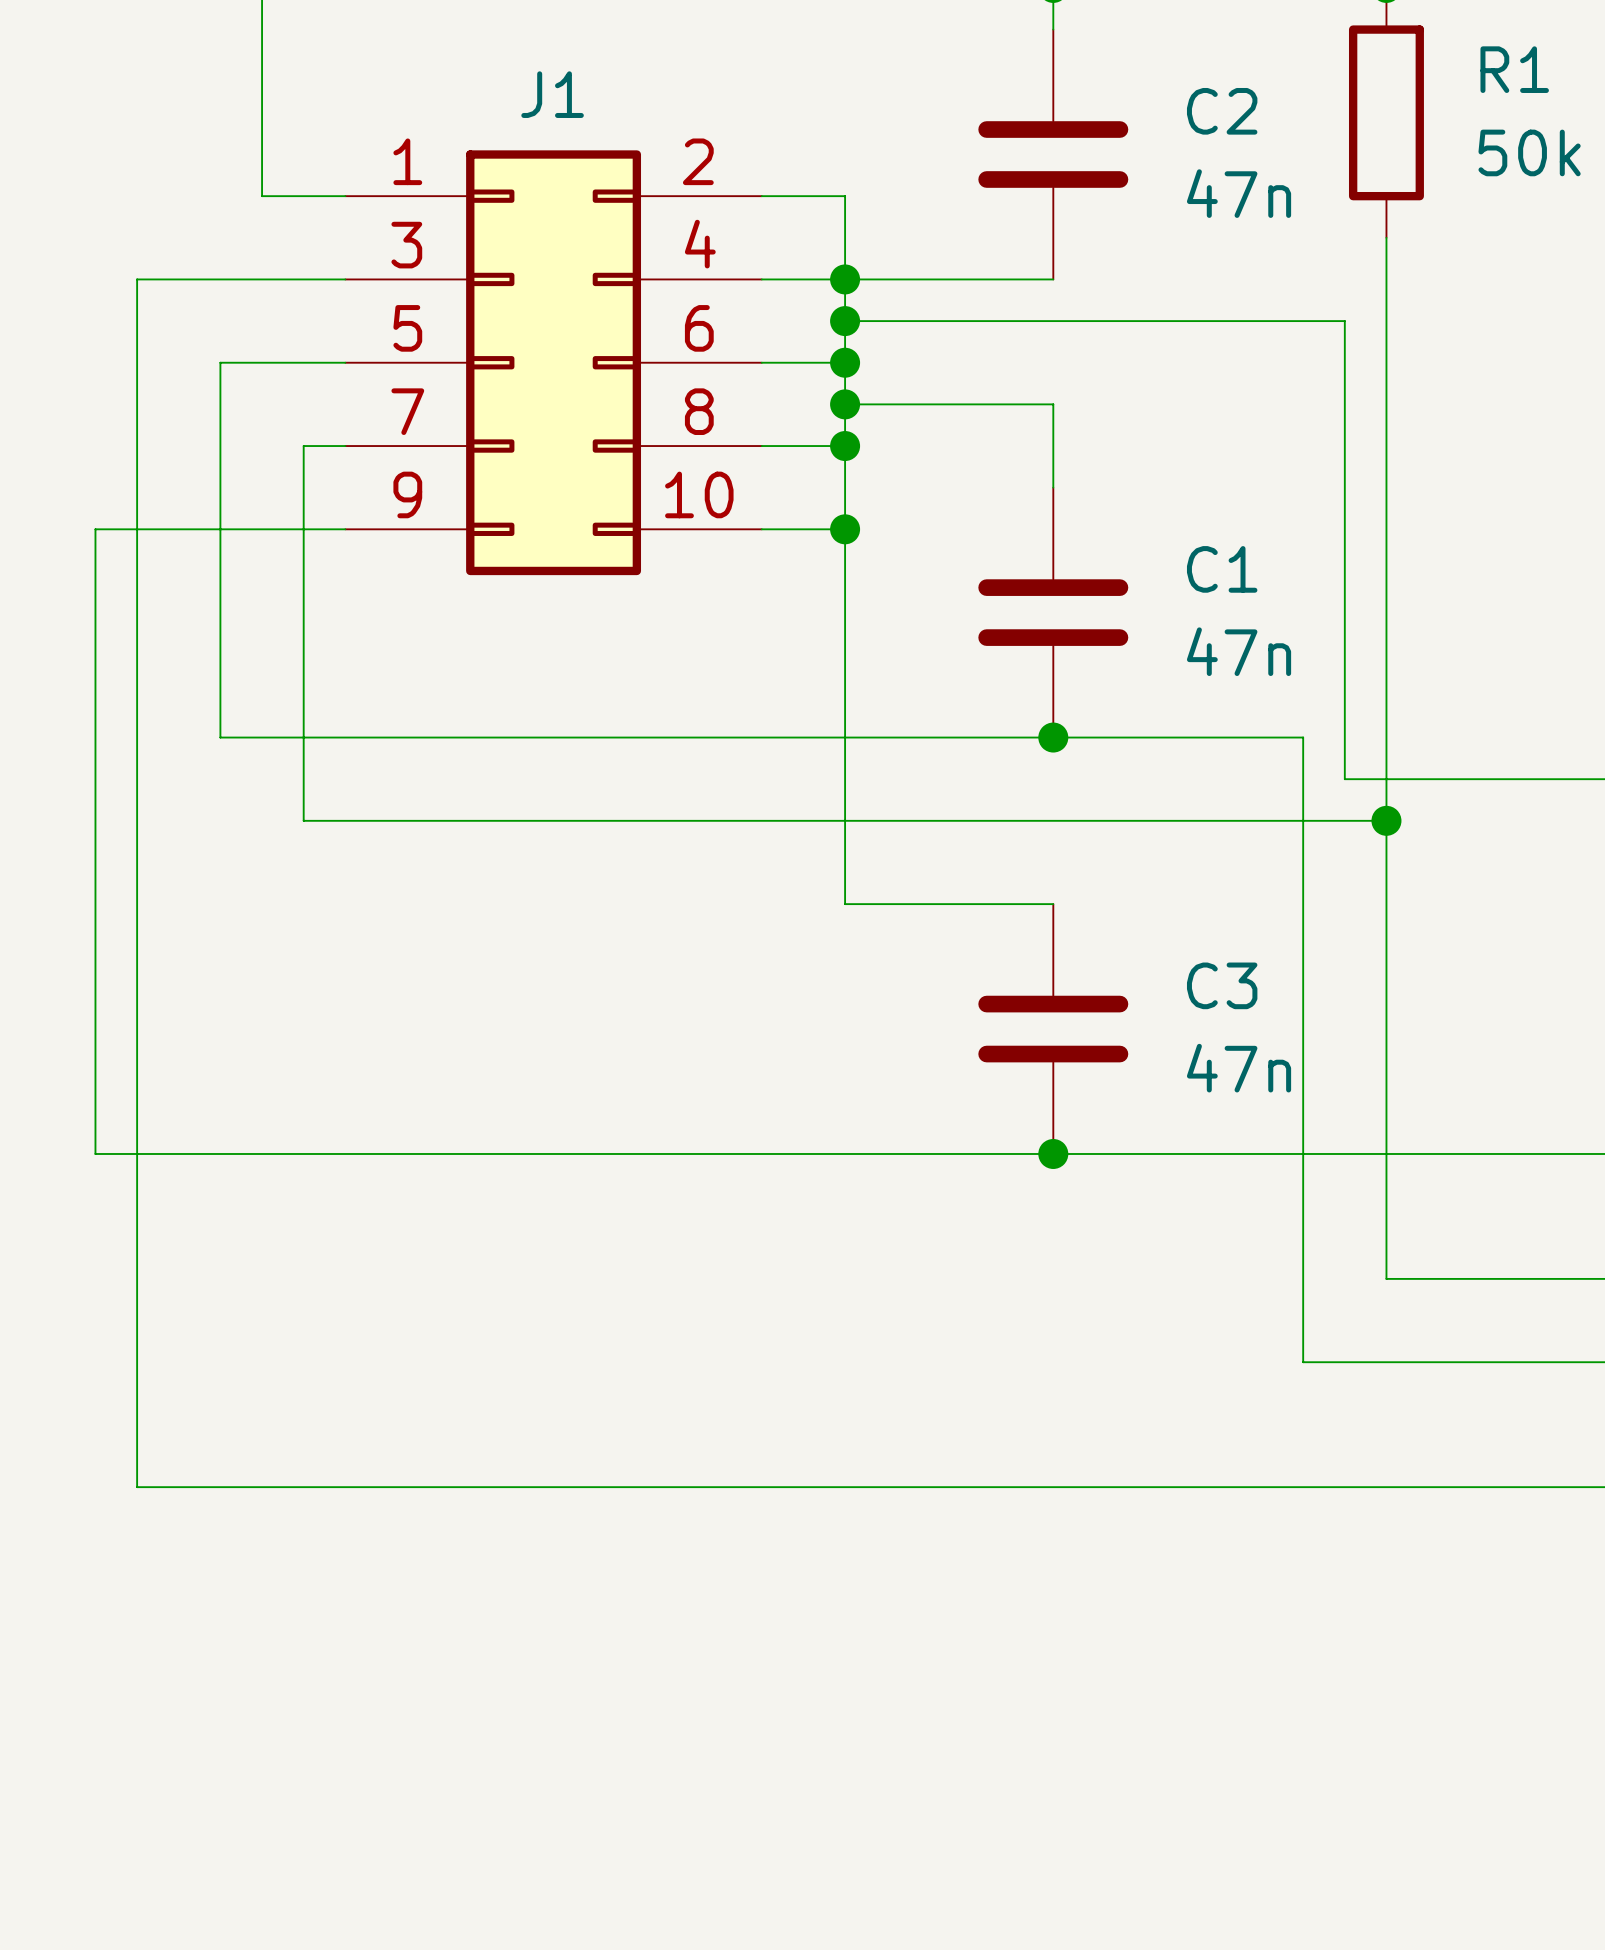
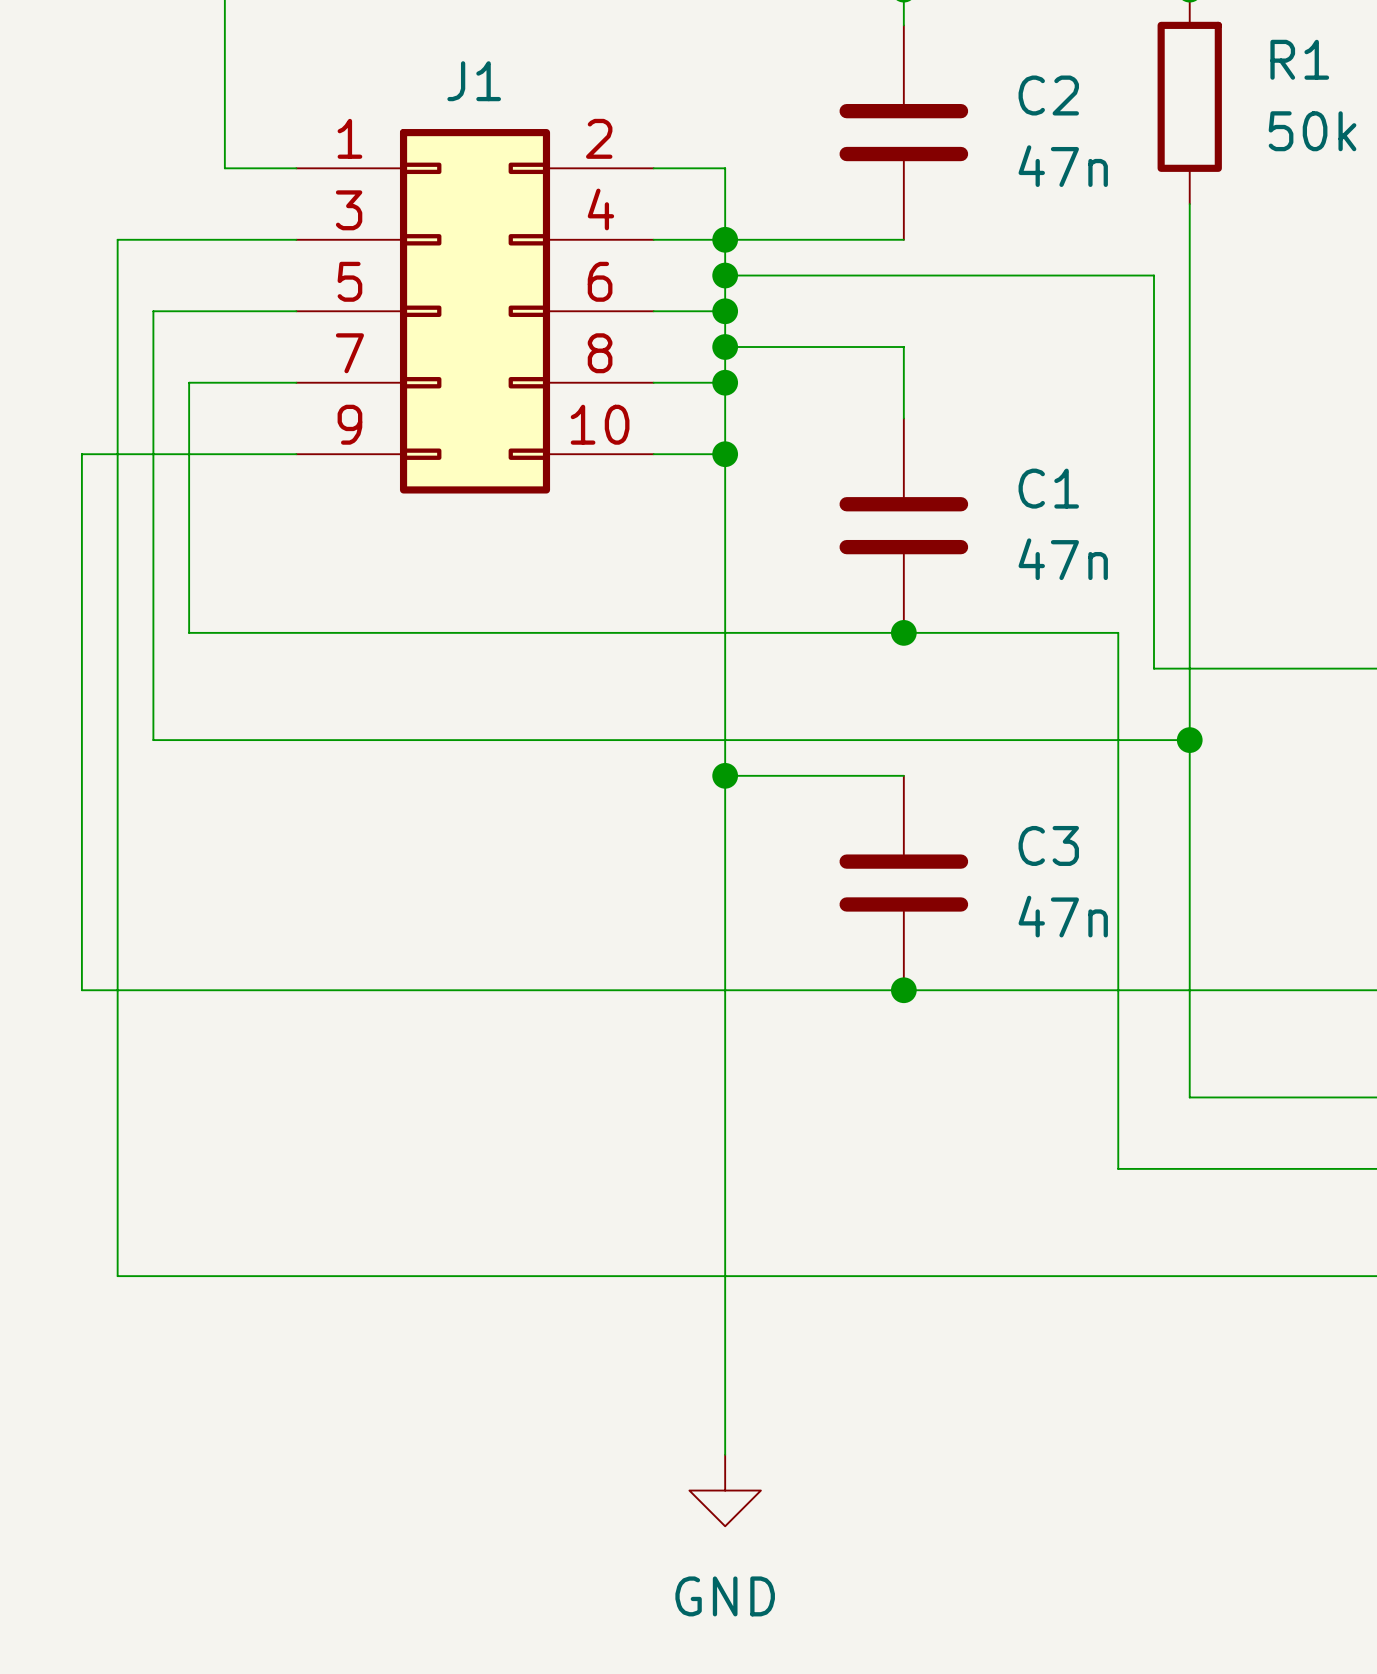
wire: (220, 362) (220, 446) -> (260, 382) (189, 382)
wire: none -> (189, 311) (153, 311) (153, 740) (1189, 740)
wire: (303, 446) (303, 820) (1386, 820) -> none
junction position: (1386, 820) -> (1189, 740)
wire: none -> (725, 775) (725, 1454)
junction: none -> (725, 775)
power symbol: none -> GND (725, 1490)

